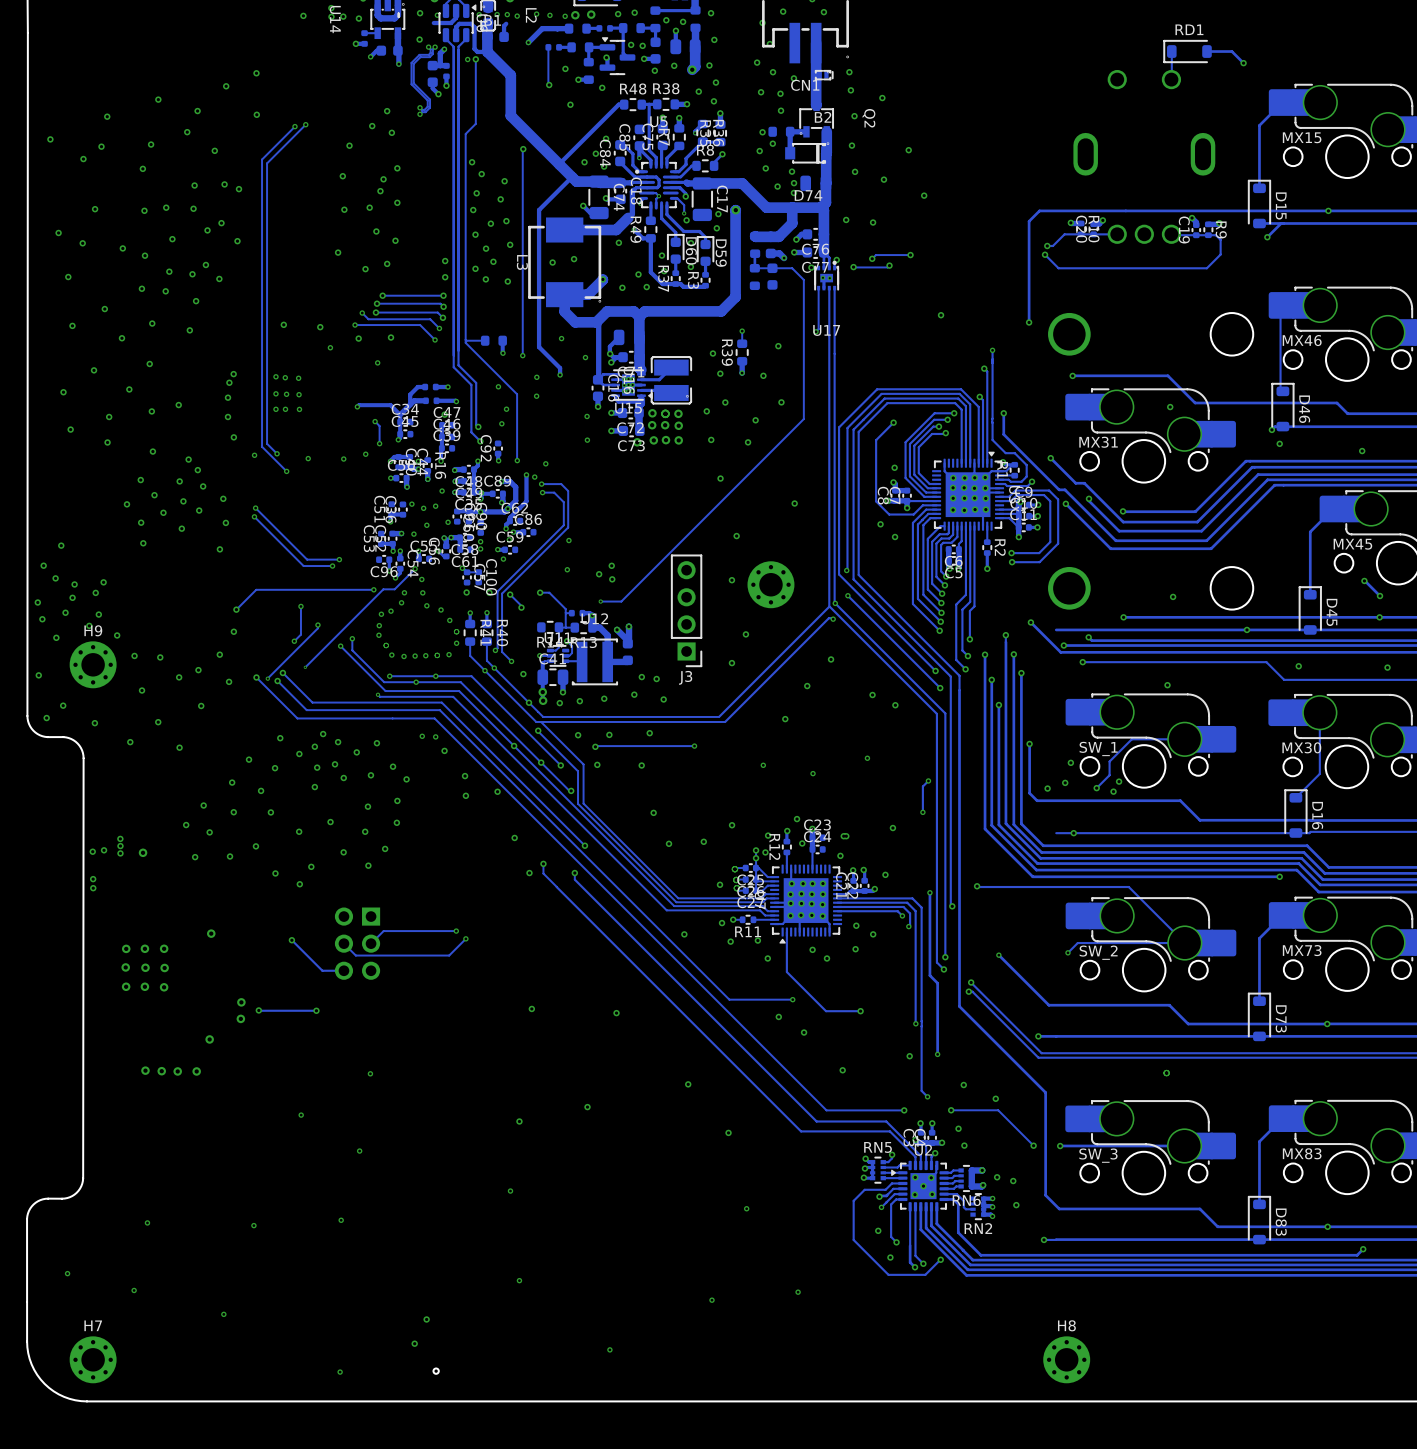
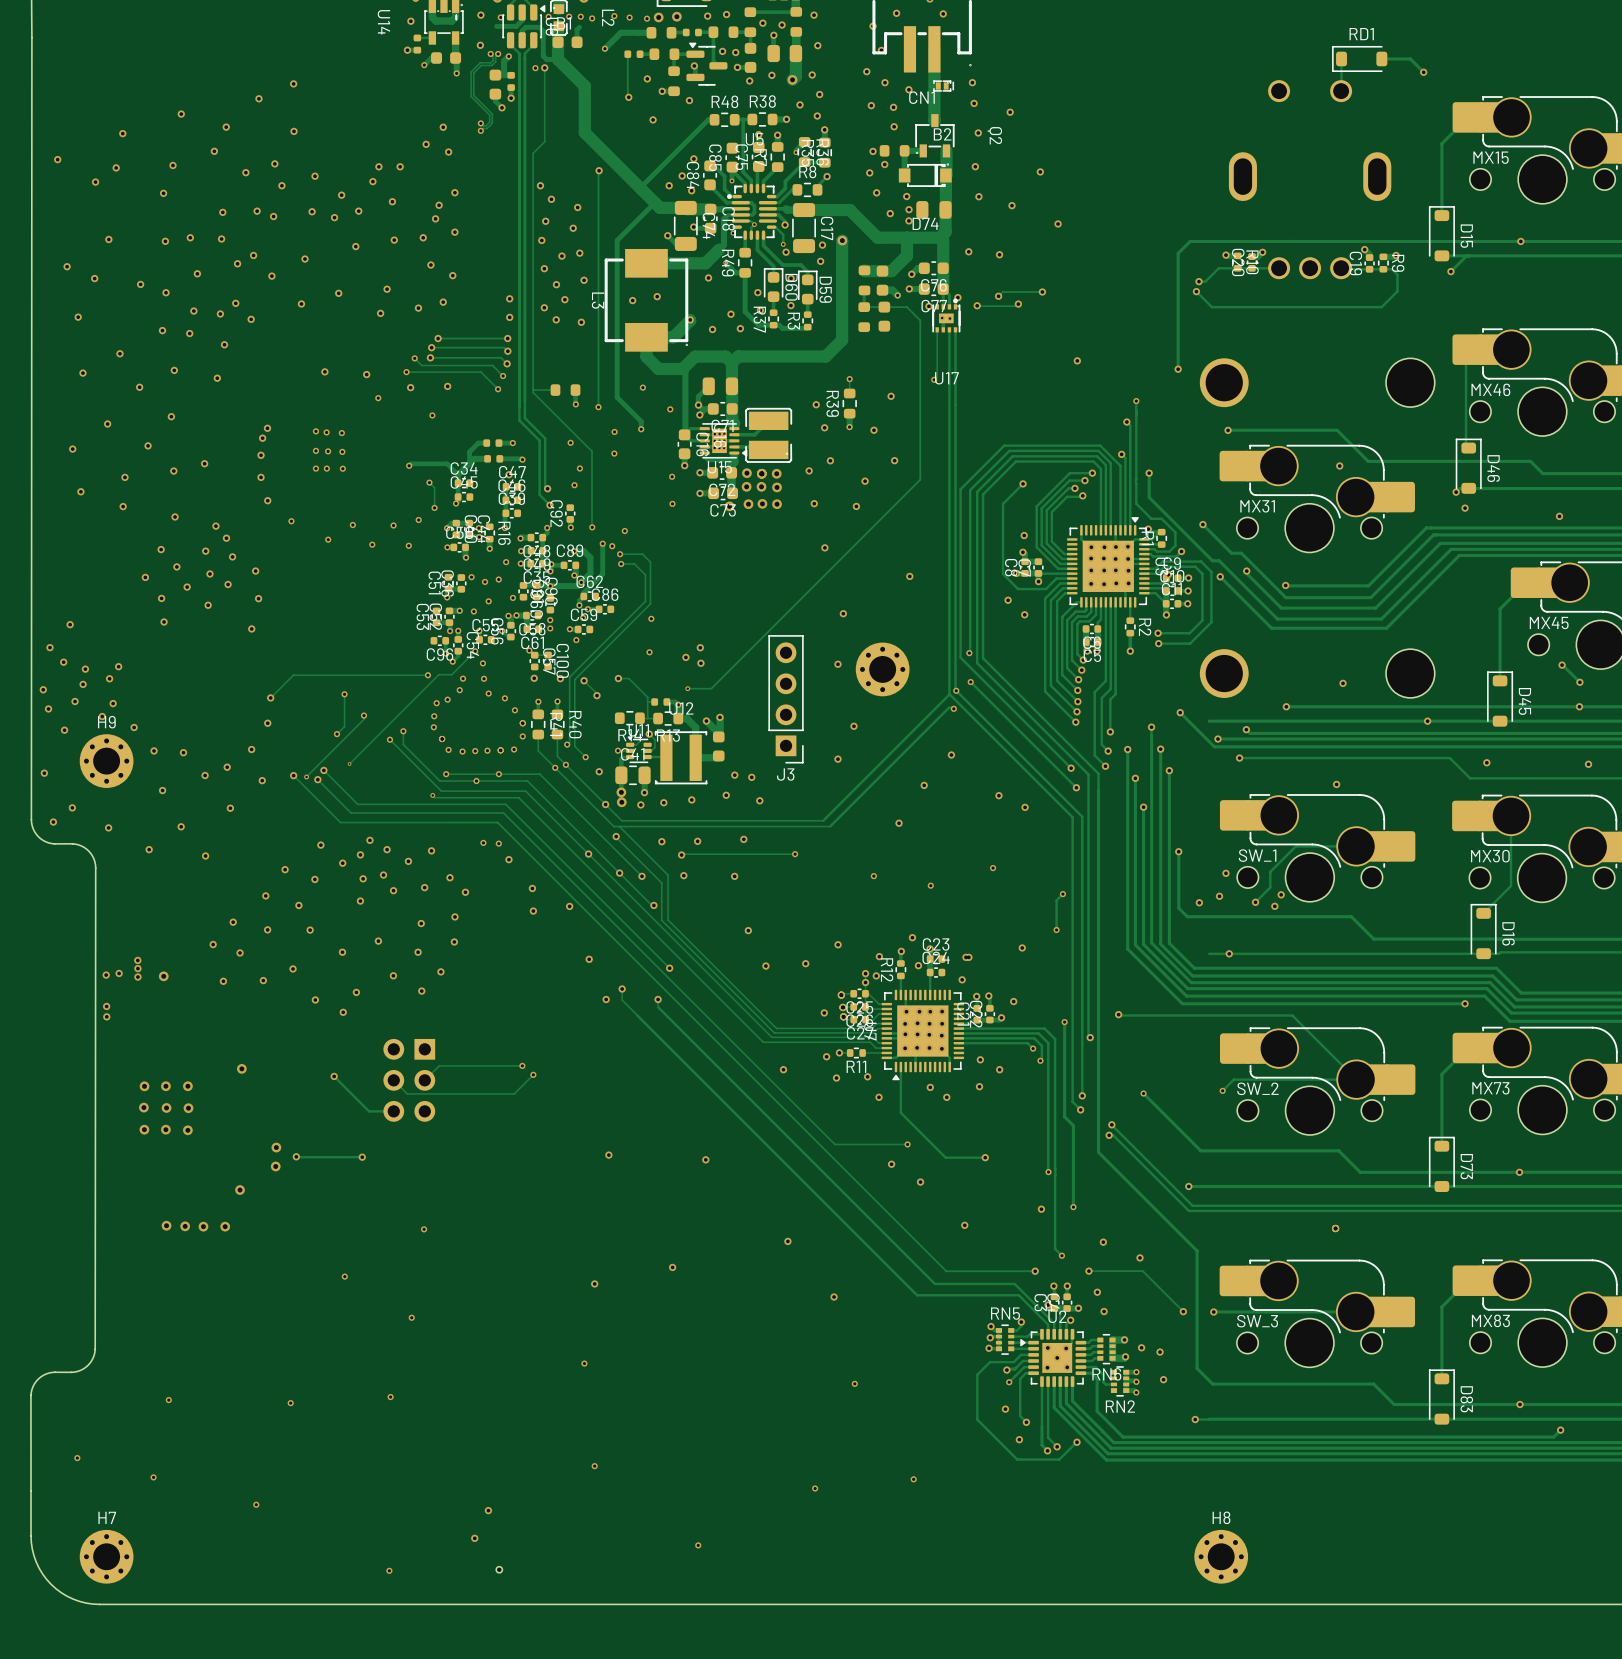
via: (331, 8) -> none
via: (303, 15) -> none
via: (331, 16) -> none
via: (343, 16) -> none
track: (305, 124) (267, 163) (267, 443) (277, 453) -> none
via: (305, 124) -> none
track: (294, 126) (262, 159) (262, 446) (286, 471) -> none
via: (294, 126) -> none
via: none -> (274, 163)
via: none -> (378, 166)
via: none -> (315, 176)
via: none -> (372, 181)
via: none -> (281, 185)
via: none -> (341, 195)
via: none -> (312, 211)
via: none -> (358, 211)
via: none -> (334, 217)
via: none -> (355, 246)
via: none -> (305, 259)
via: none -> (338, 293)
via: none -> (301, 303)
via: none -> (380, 313)
via: (277, 453) -> none
via: none -> (372, 544)
via: none -> (408, 545)
track: (255, 508) (307, 559) (339, 559) -> none
via: (255, 508) -> none
track: (254, 516) (303, 566) (332, 566) -> none
via: (254, 516) -> none
via: (339, 559) -> none
via: (332, 566) -> none

